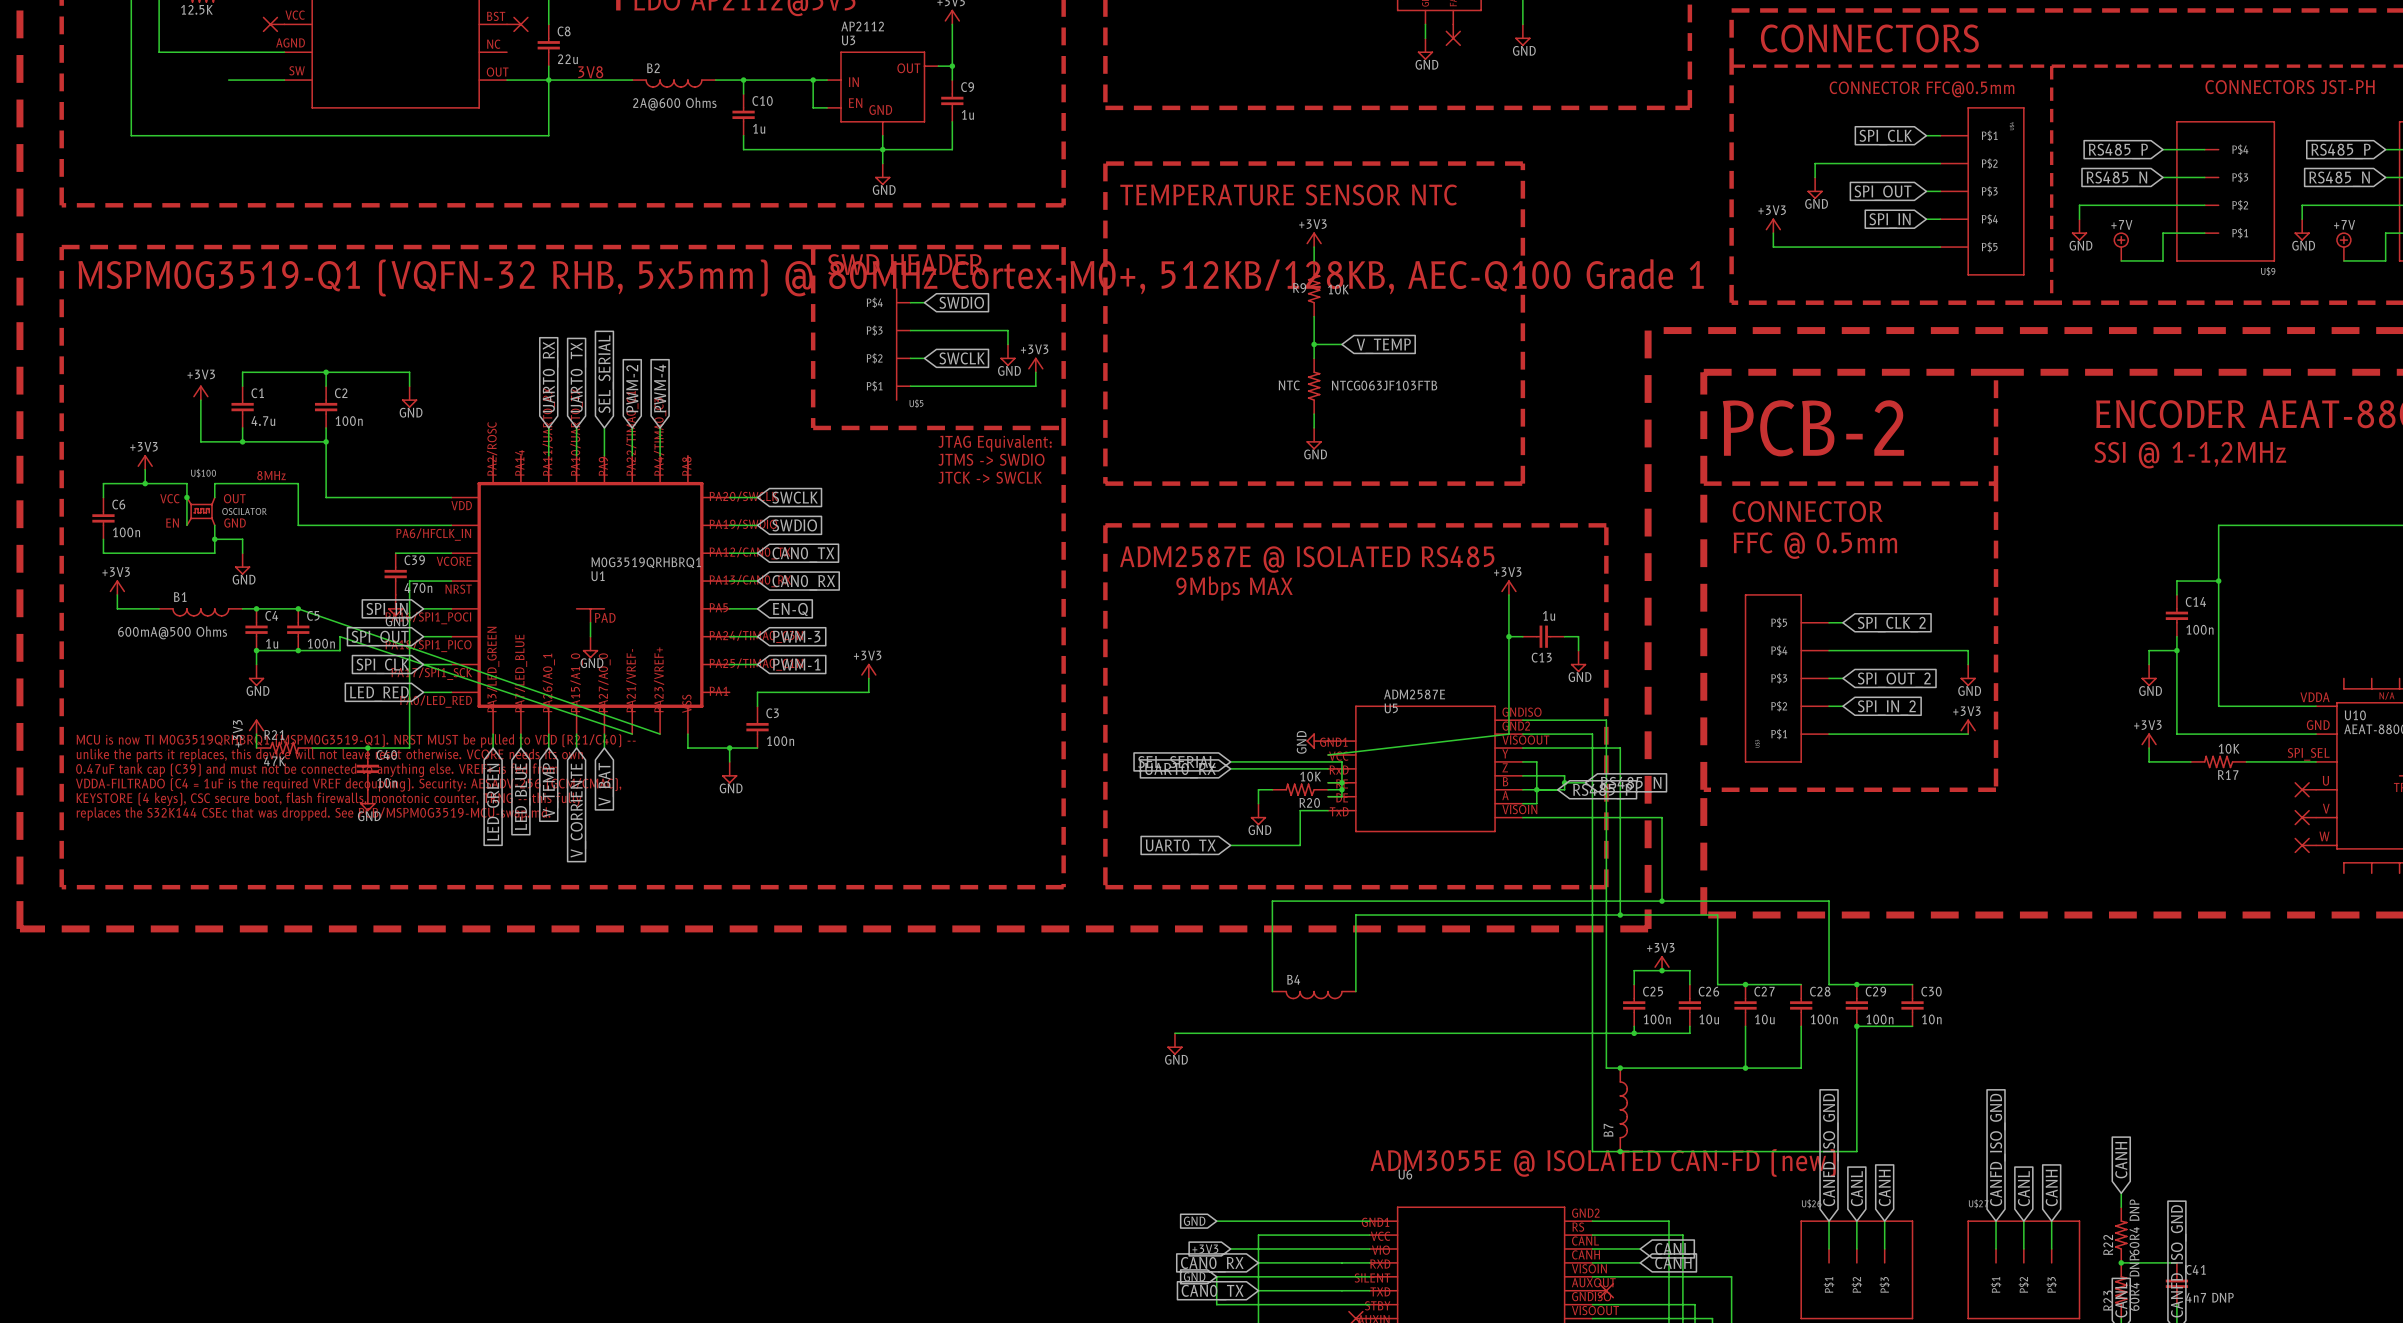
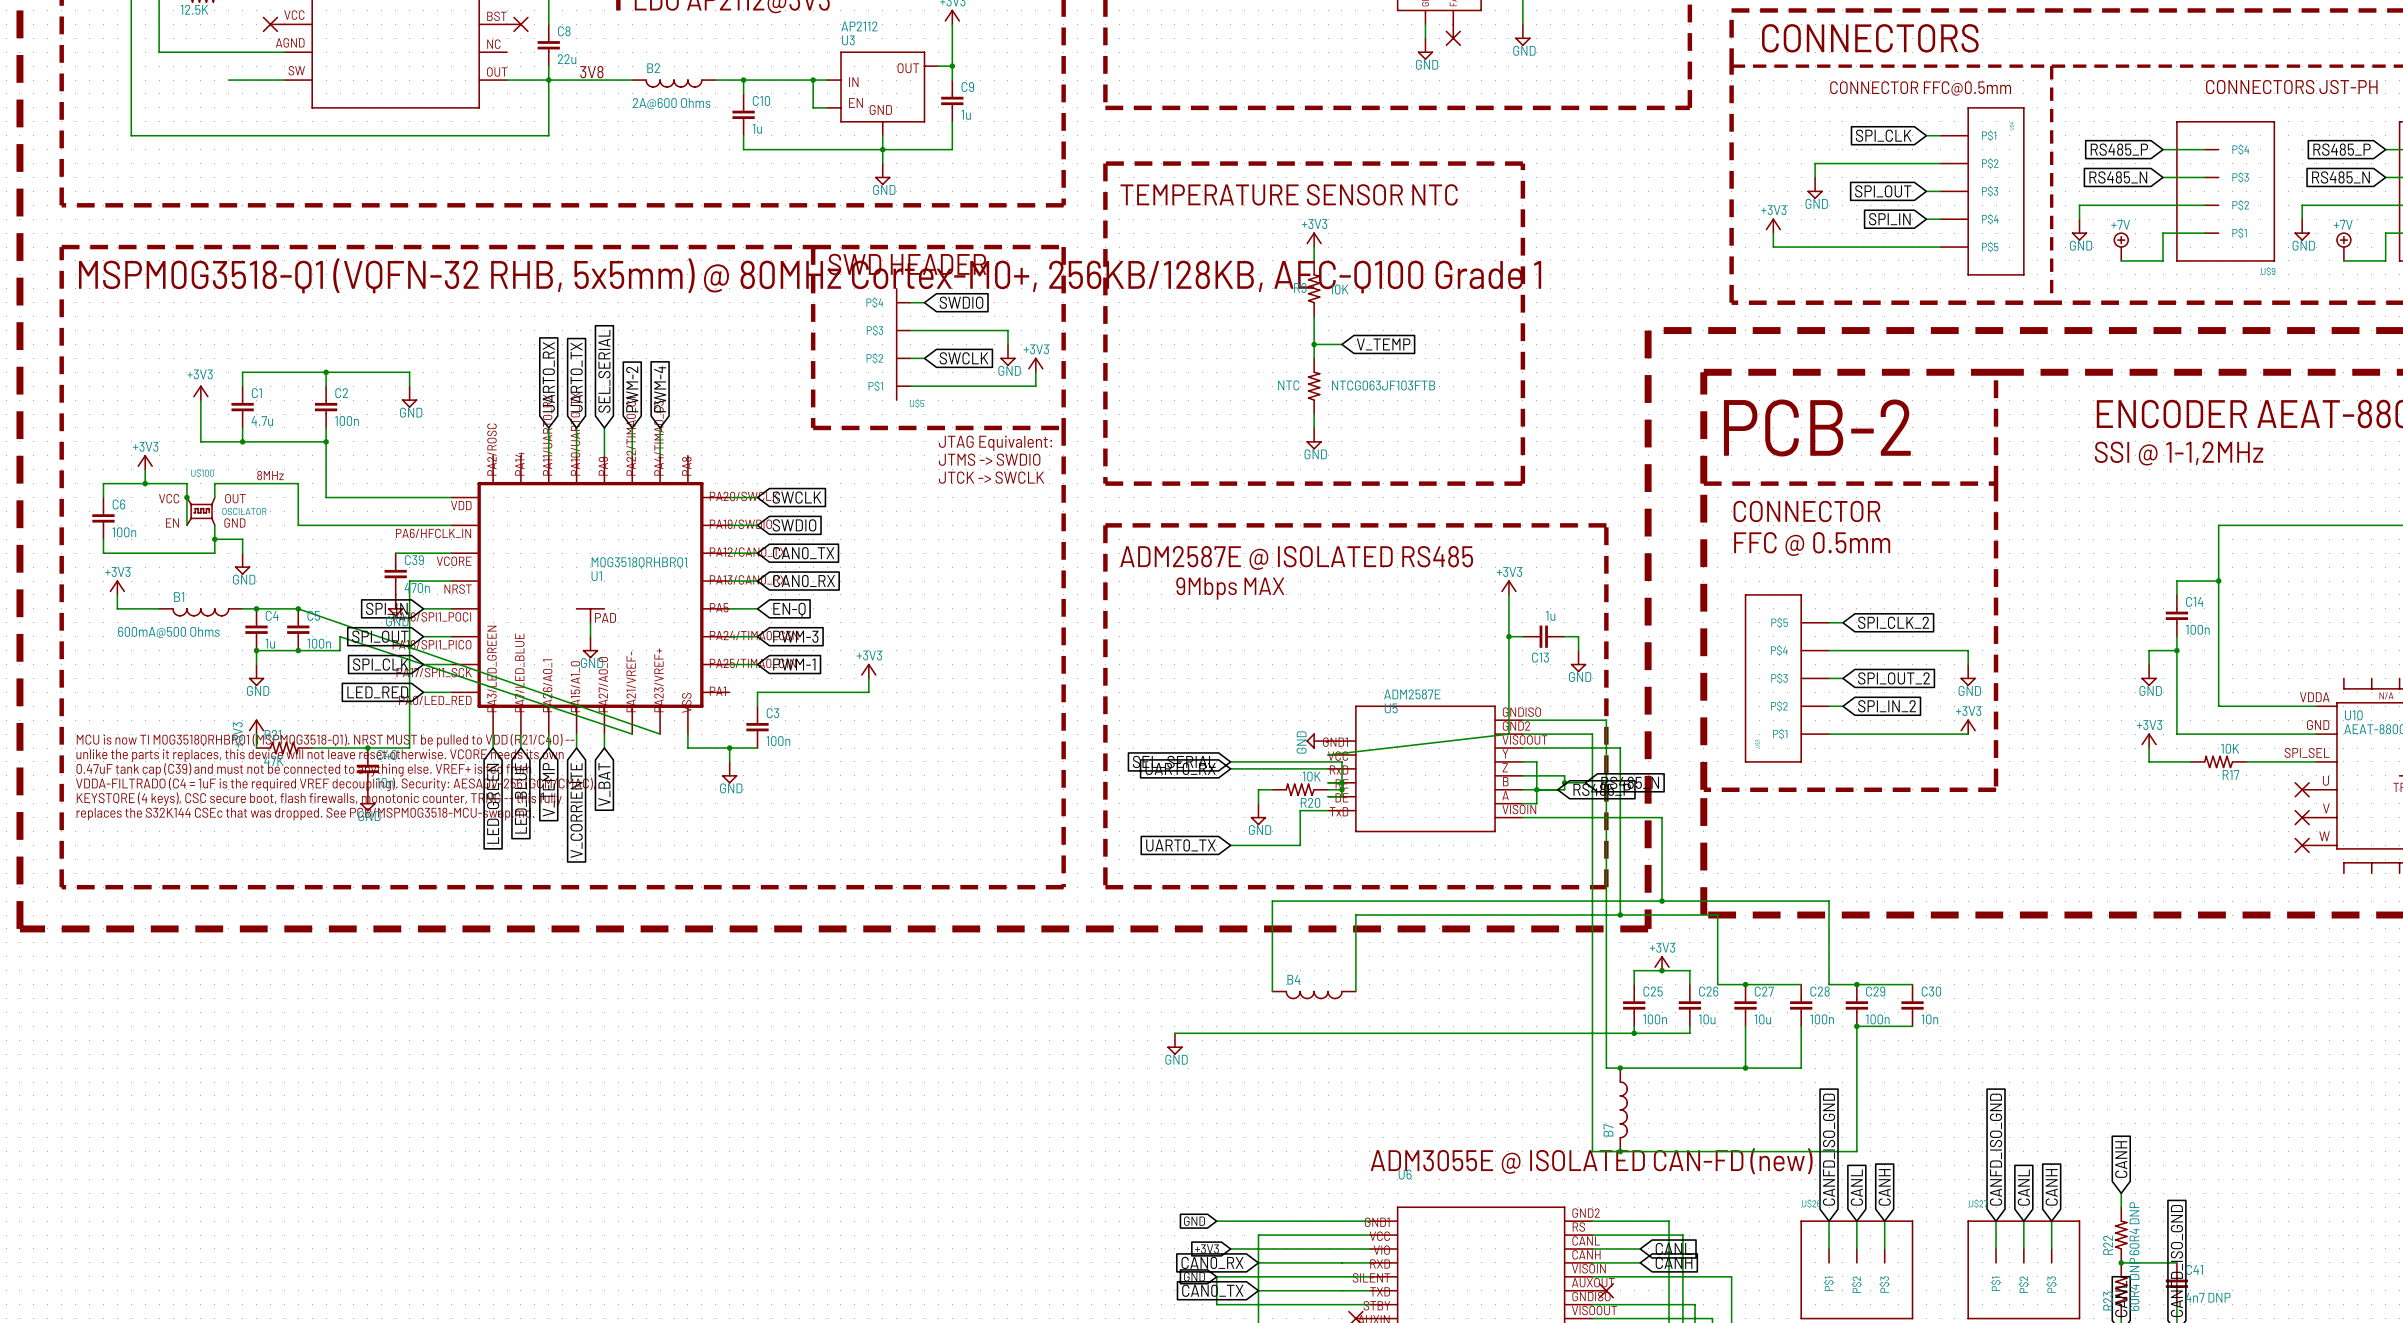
text: MSPM0G3519-Q1 (VQFN-32 RHB, 5x5mm) @ 80MHz Cortex-M0+, 512KB/128KB, AEC-Q100 Grade 1 (891, 277) -> MSPM0G3518-Q1 (VQFN-32 RHB, 5x5mm) @ 80MHz Cortex-M0+, 256KB/128KB, AEC-Q100 Grade 1 (810, 275)
U1 value: M0G3519QRHBRQ1 (646, 562) -> M0G3518QRHBRQ1 (639, 562)
text: MCU is now TI M0G3519QRHBRQ1 (MSPM0G3519-Q1). NRST MUST be pulled to VDD (R21/C40) -- (356, 740) -> MCU is now TI M0G3518QRHBRQ1 (MSPM0G3518-Q1). NRST MUST be pulled to VDD (R21/C40) -- (325, 740)
text: replaces the S32K144 CSEc that was dropped. See PCB/MSPM0G3519-MCU-swap.md. (313, 814) -> replaces the S32K144 CSEc that was dropped. See PCB/MSPM0G3518-MCU-swap.md. (305, 814)

